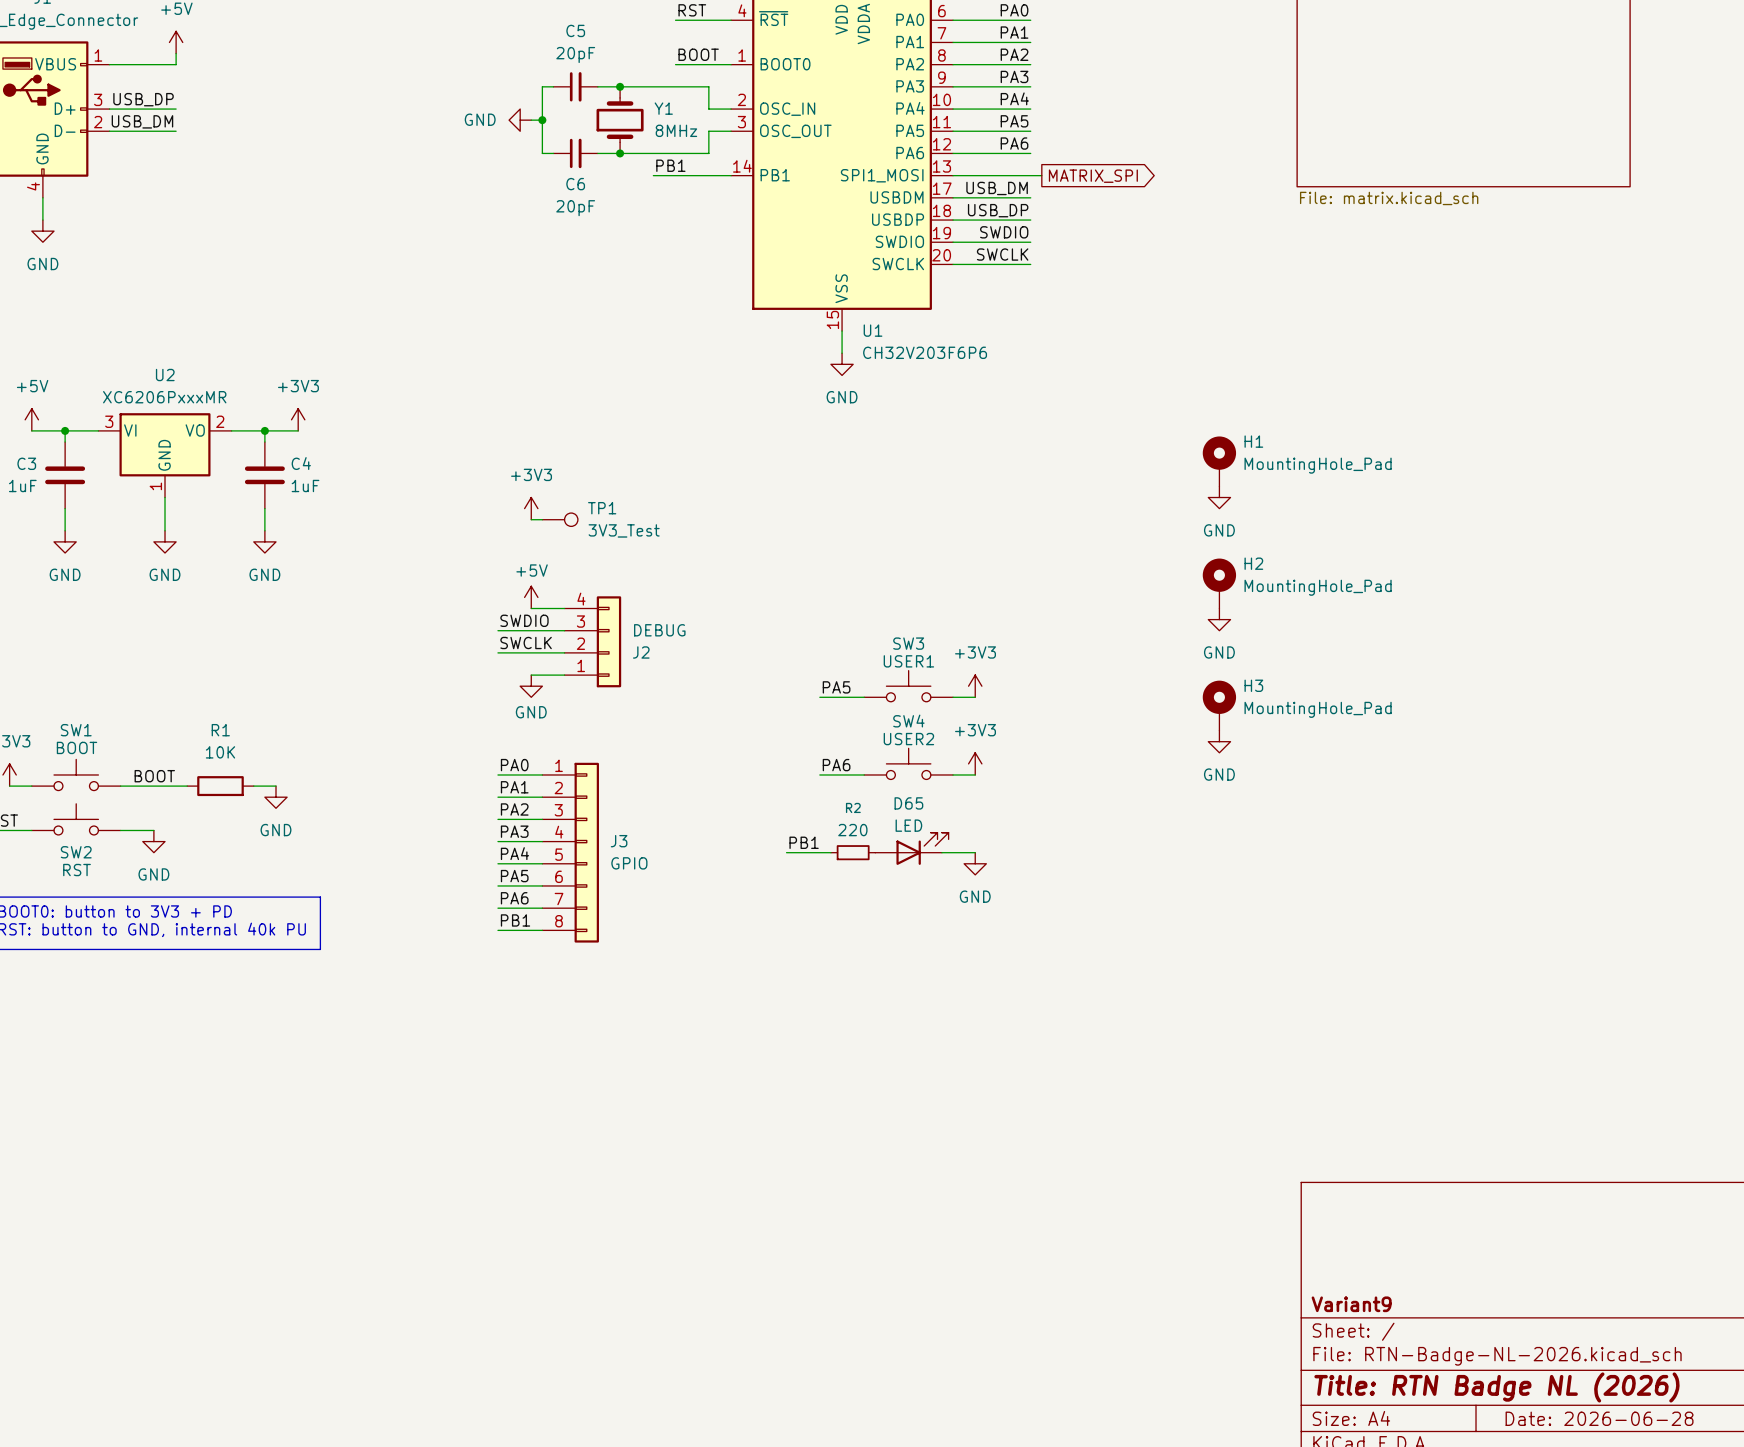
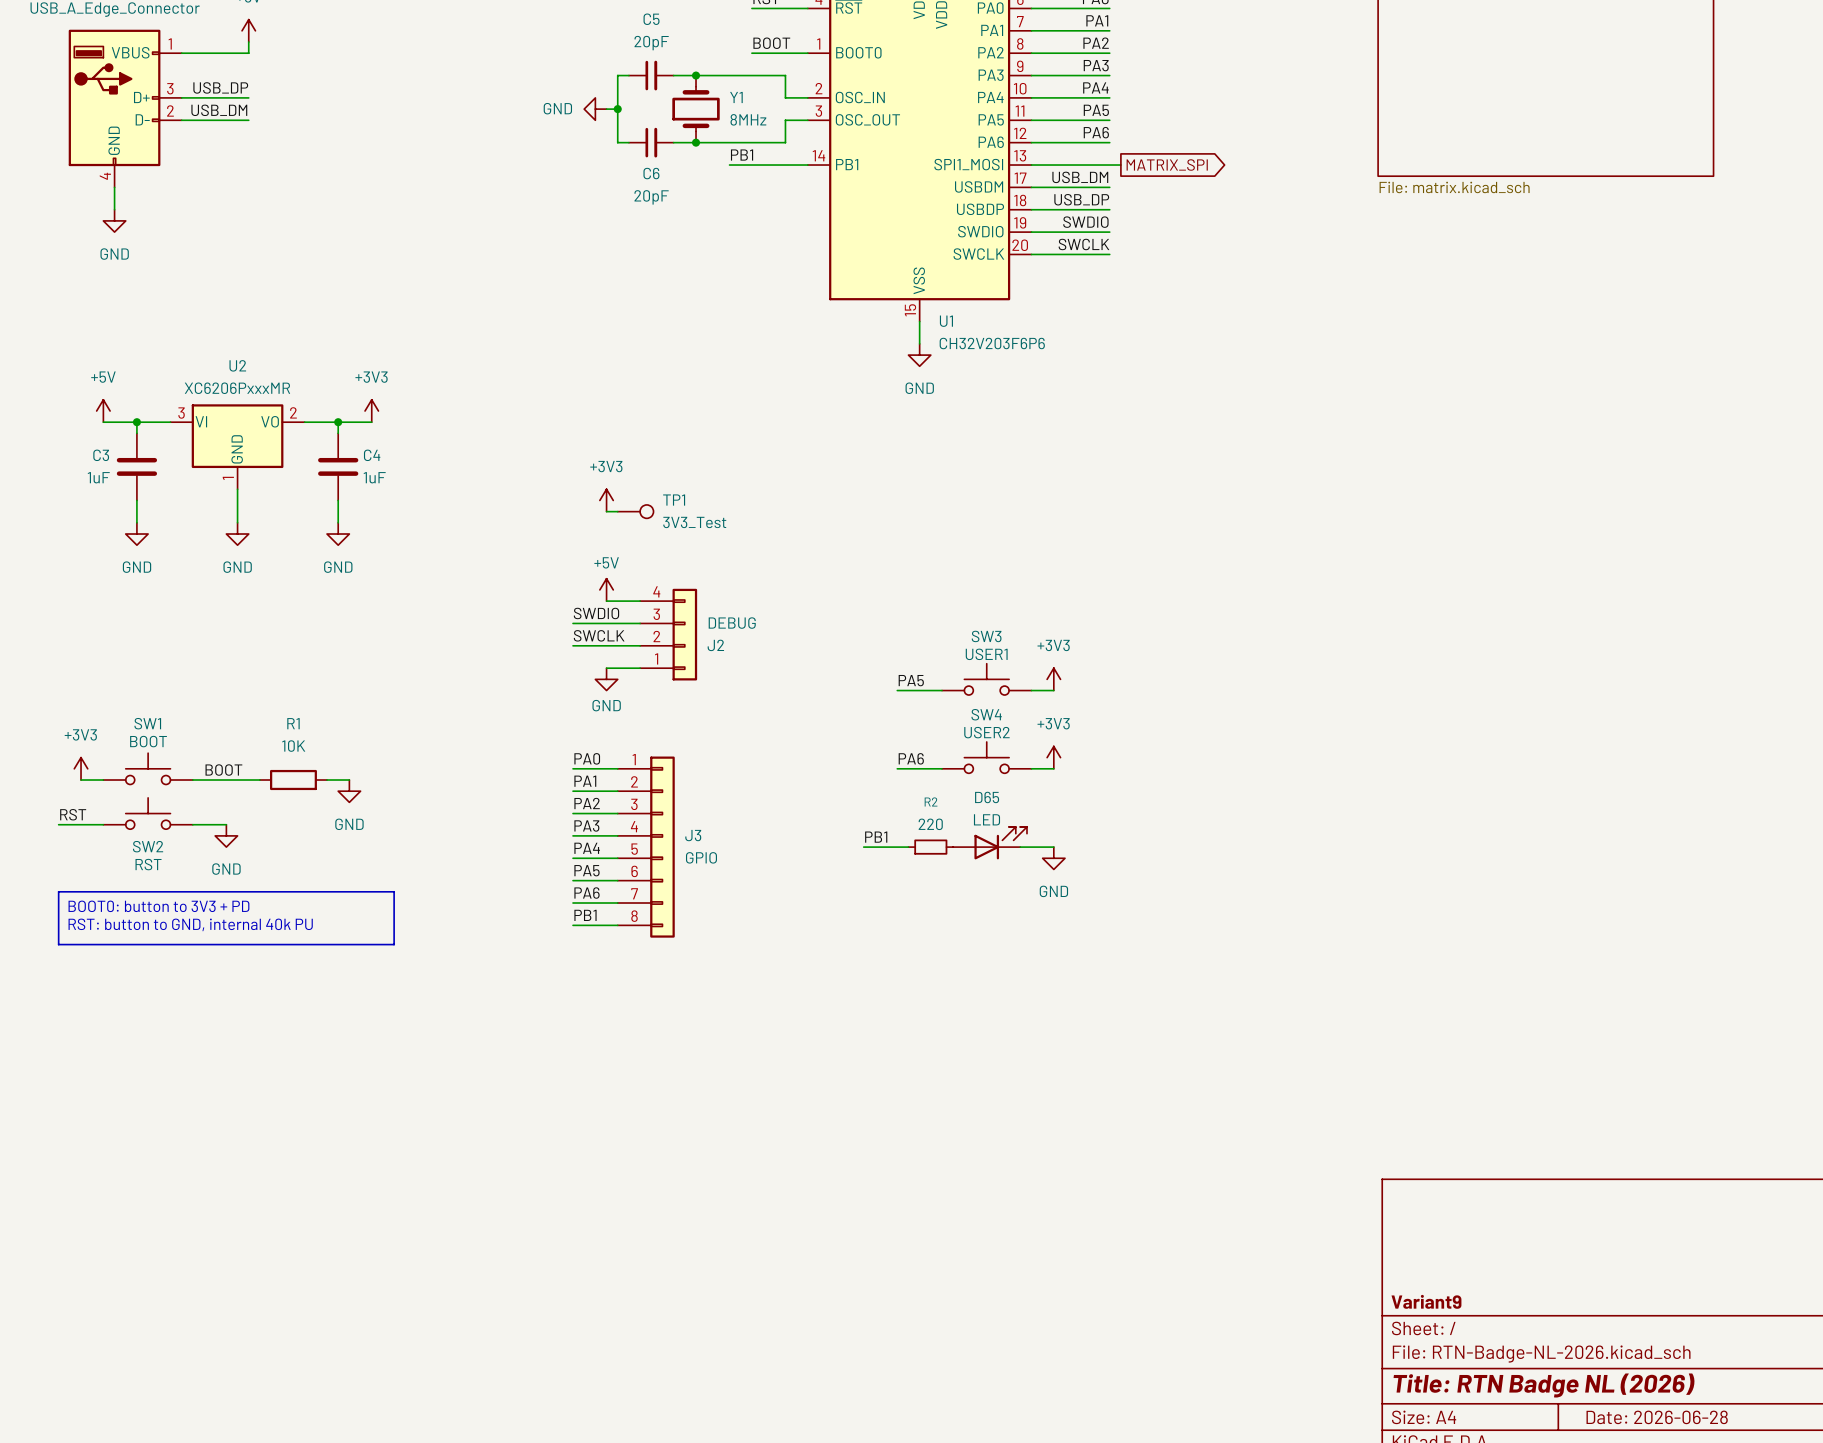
H1: MountingHole_Pad (1219, 461) -> none
power symbol: GND (1219, 497) -> none
H2: MountingHole_Pad (1219, 583) -> none
power symbol: GND (1219, 619) -> none
H3: MountingHole_Pad (1219, 705) -> none
power symbol: GND (1219, 741) -> none

